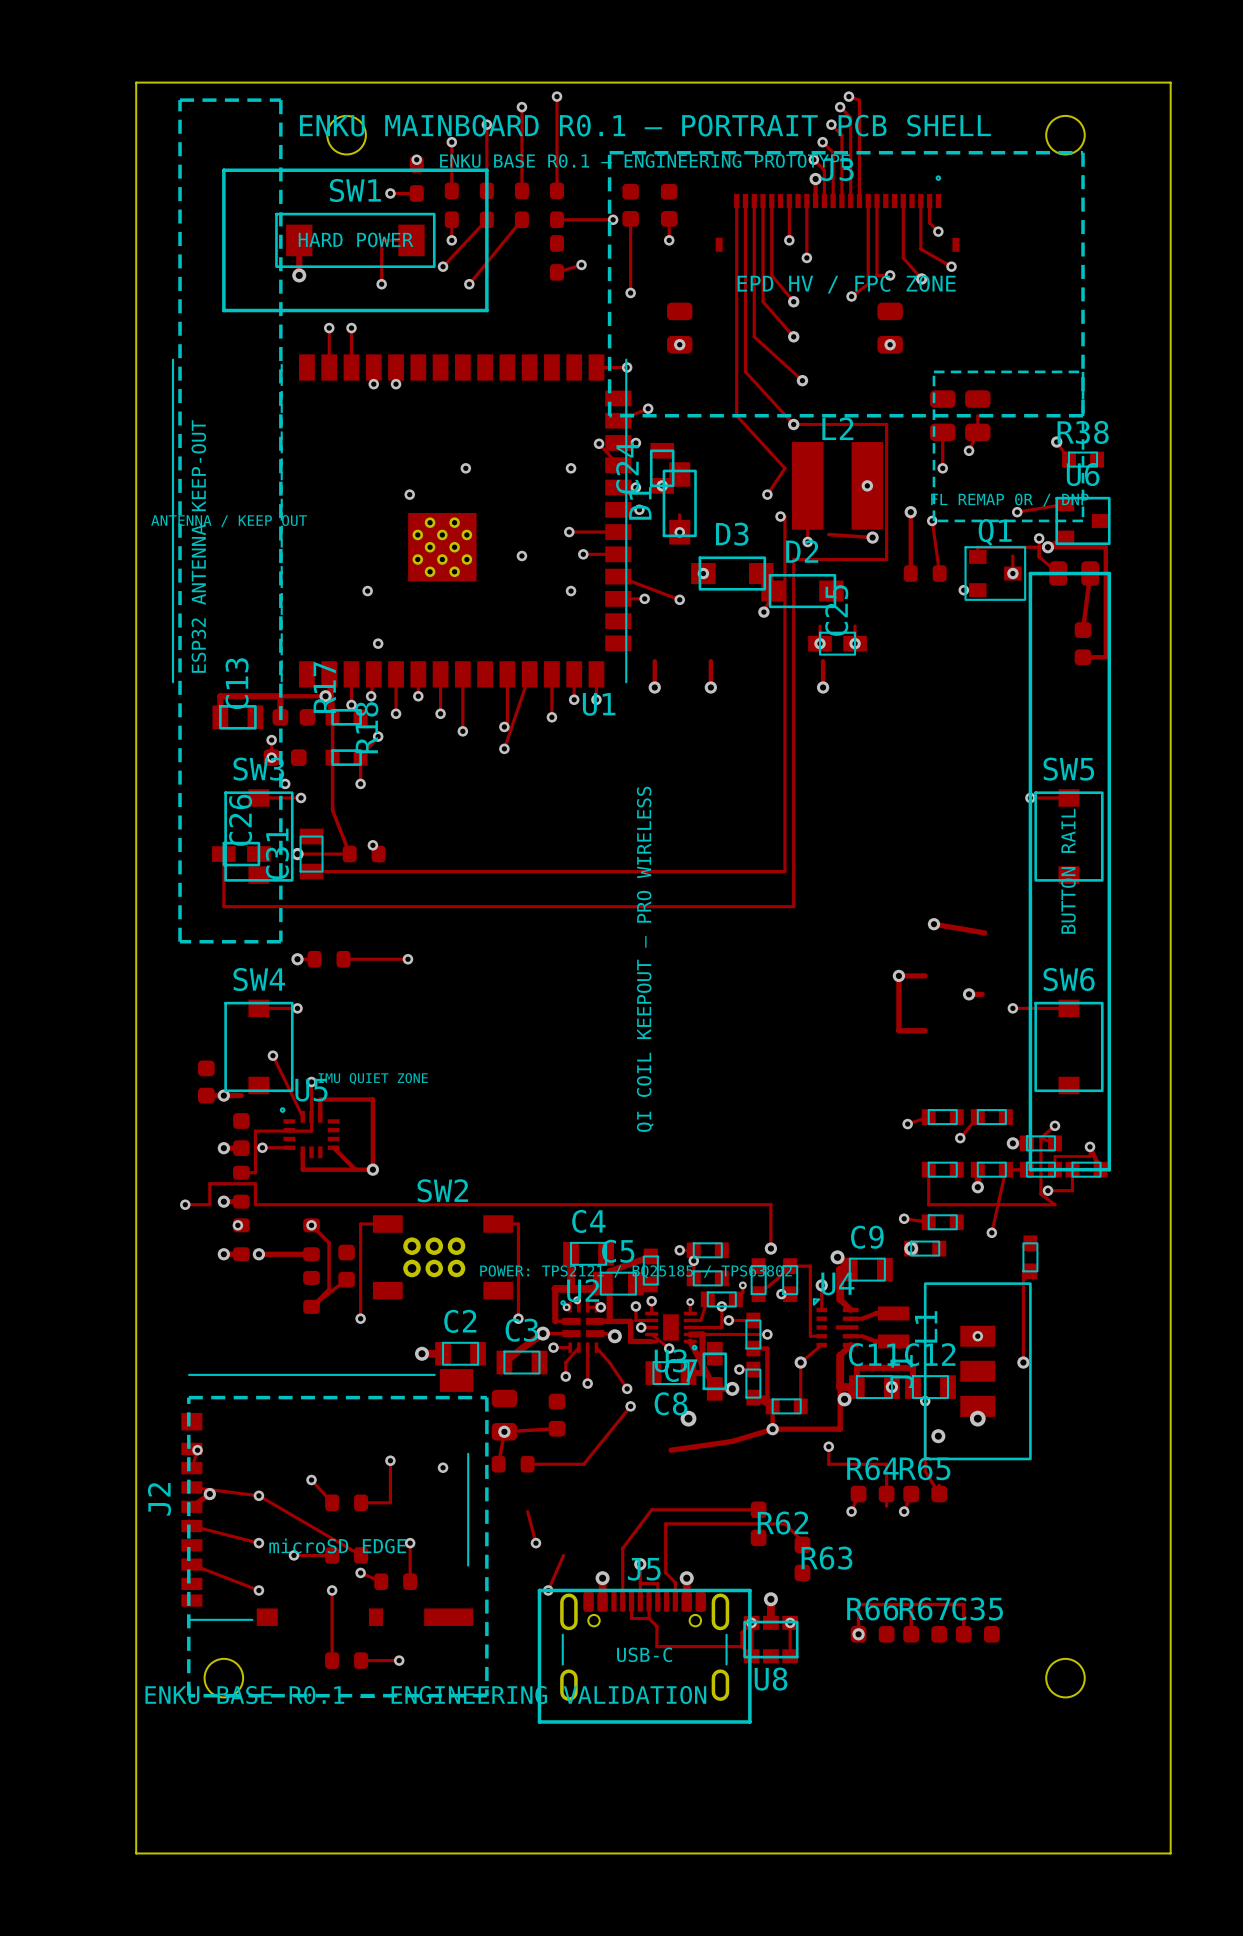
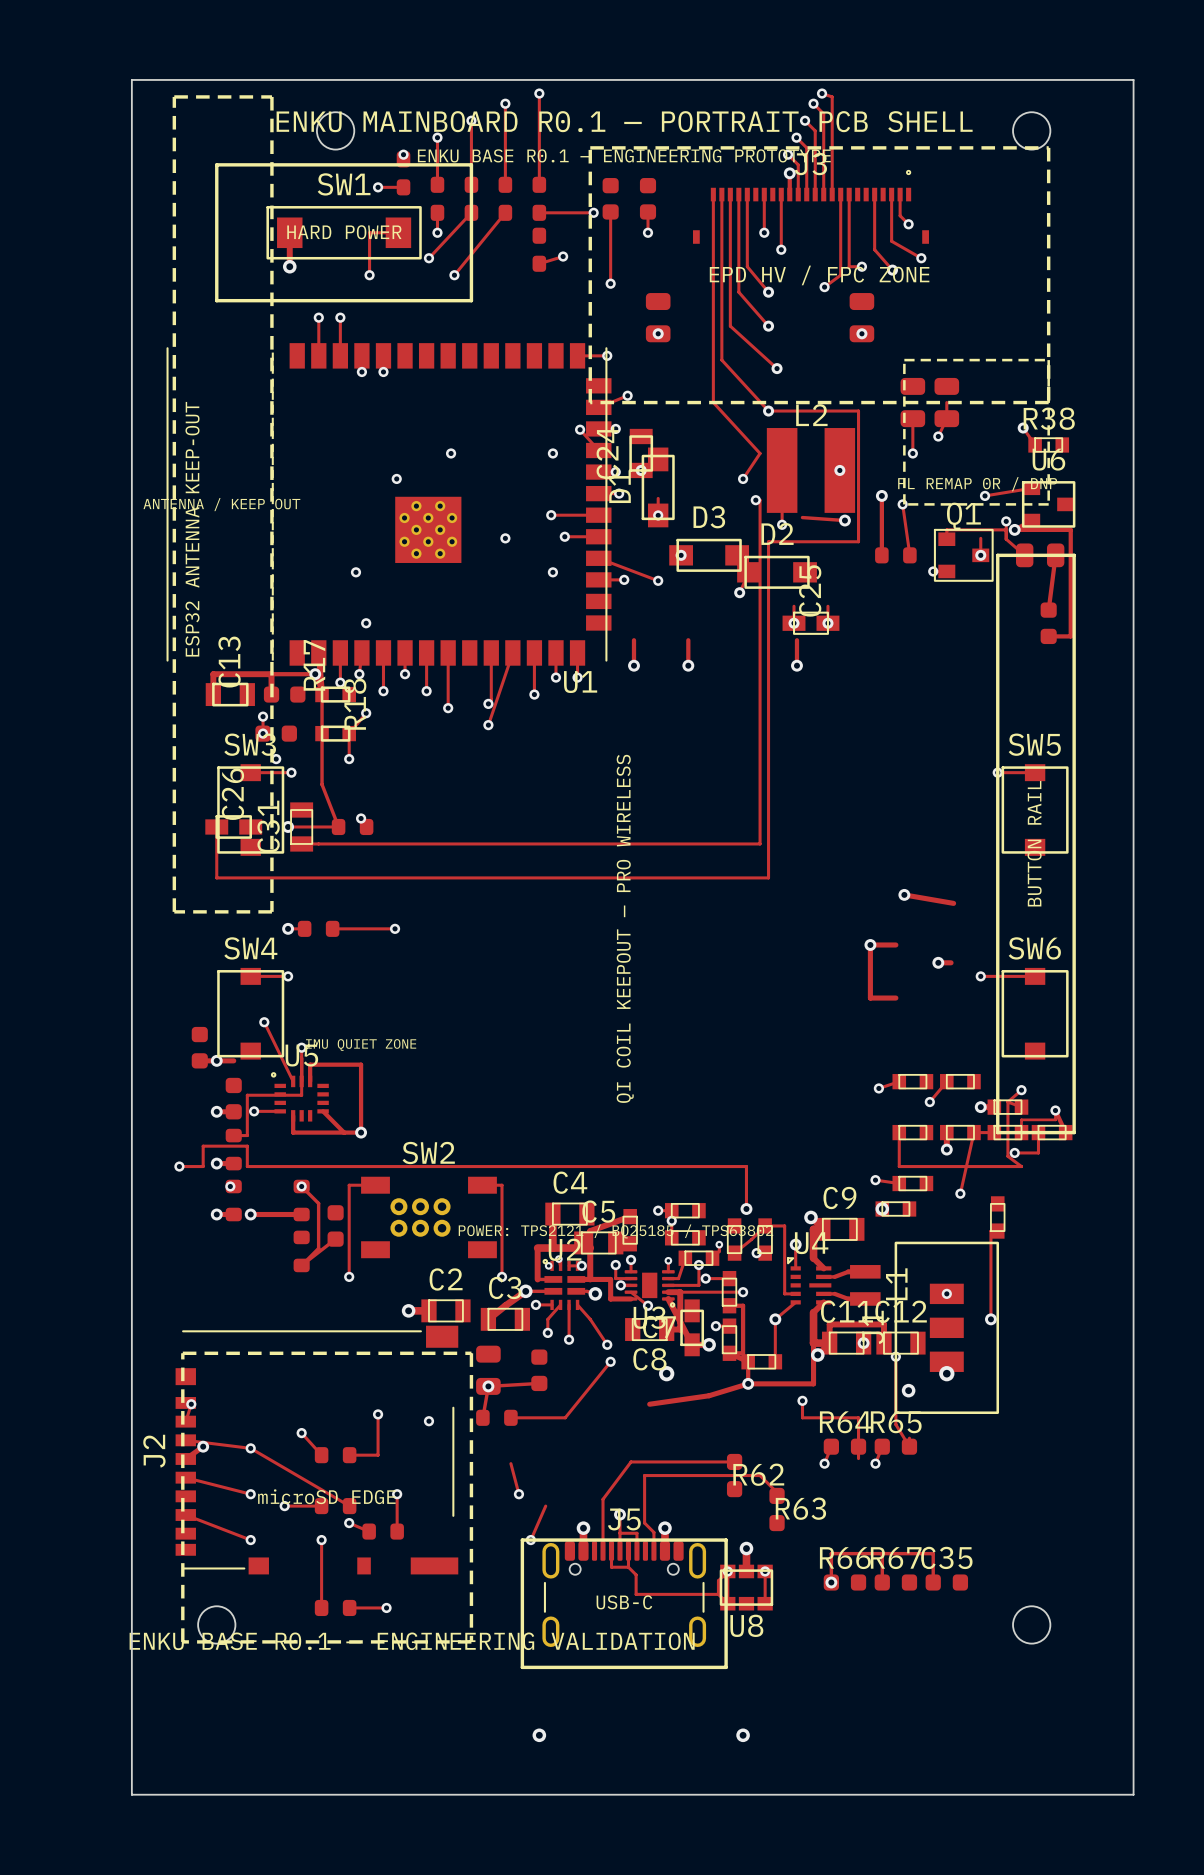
via: none -> (539, 1735)
via: none -> (743, 1735)

